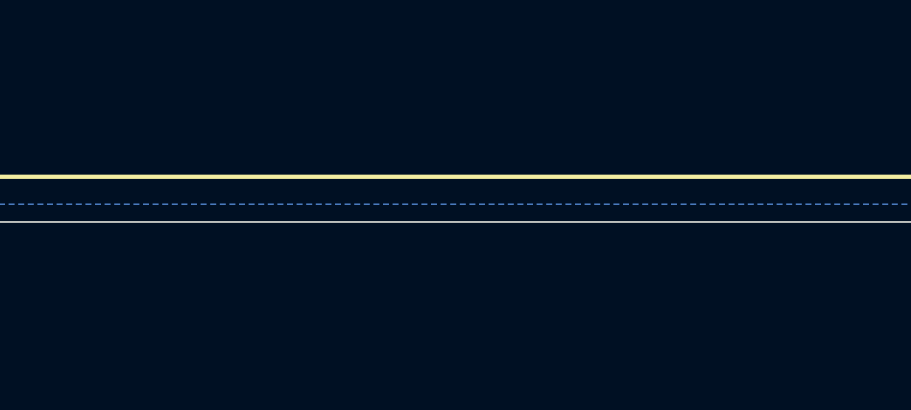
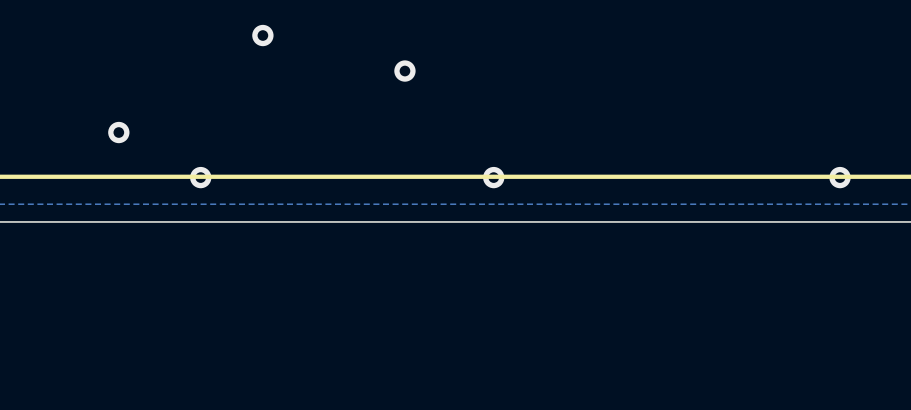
via: none -> (262, 35)
via: none -> (404, 71)
via: none -> (118, 132)
via: none -> (200, 177)
via: none -> (493, 177)
via: none -> (840, 177)

